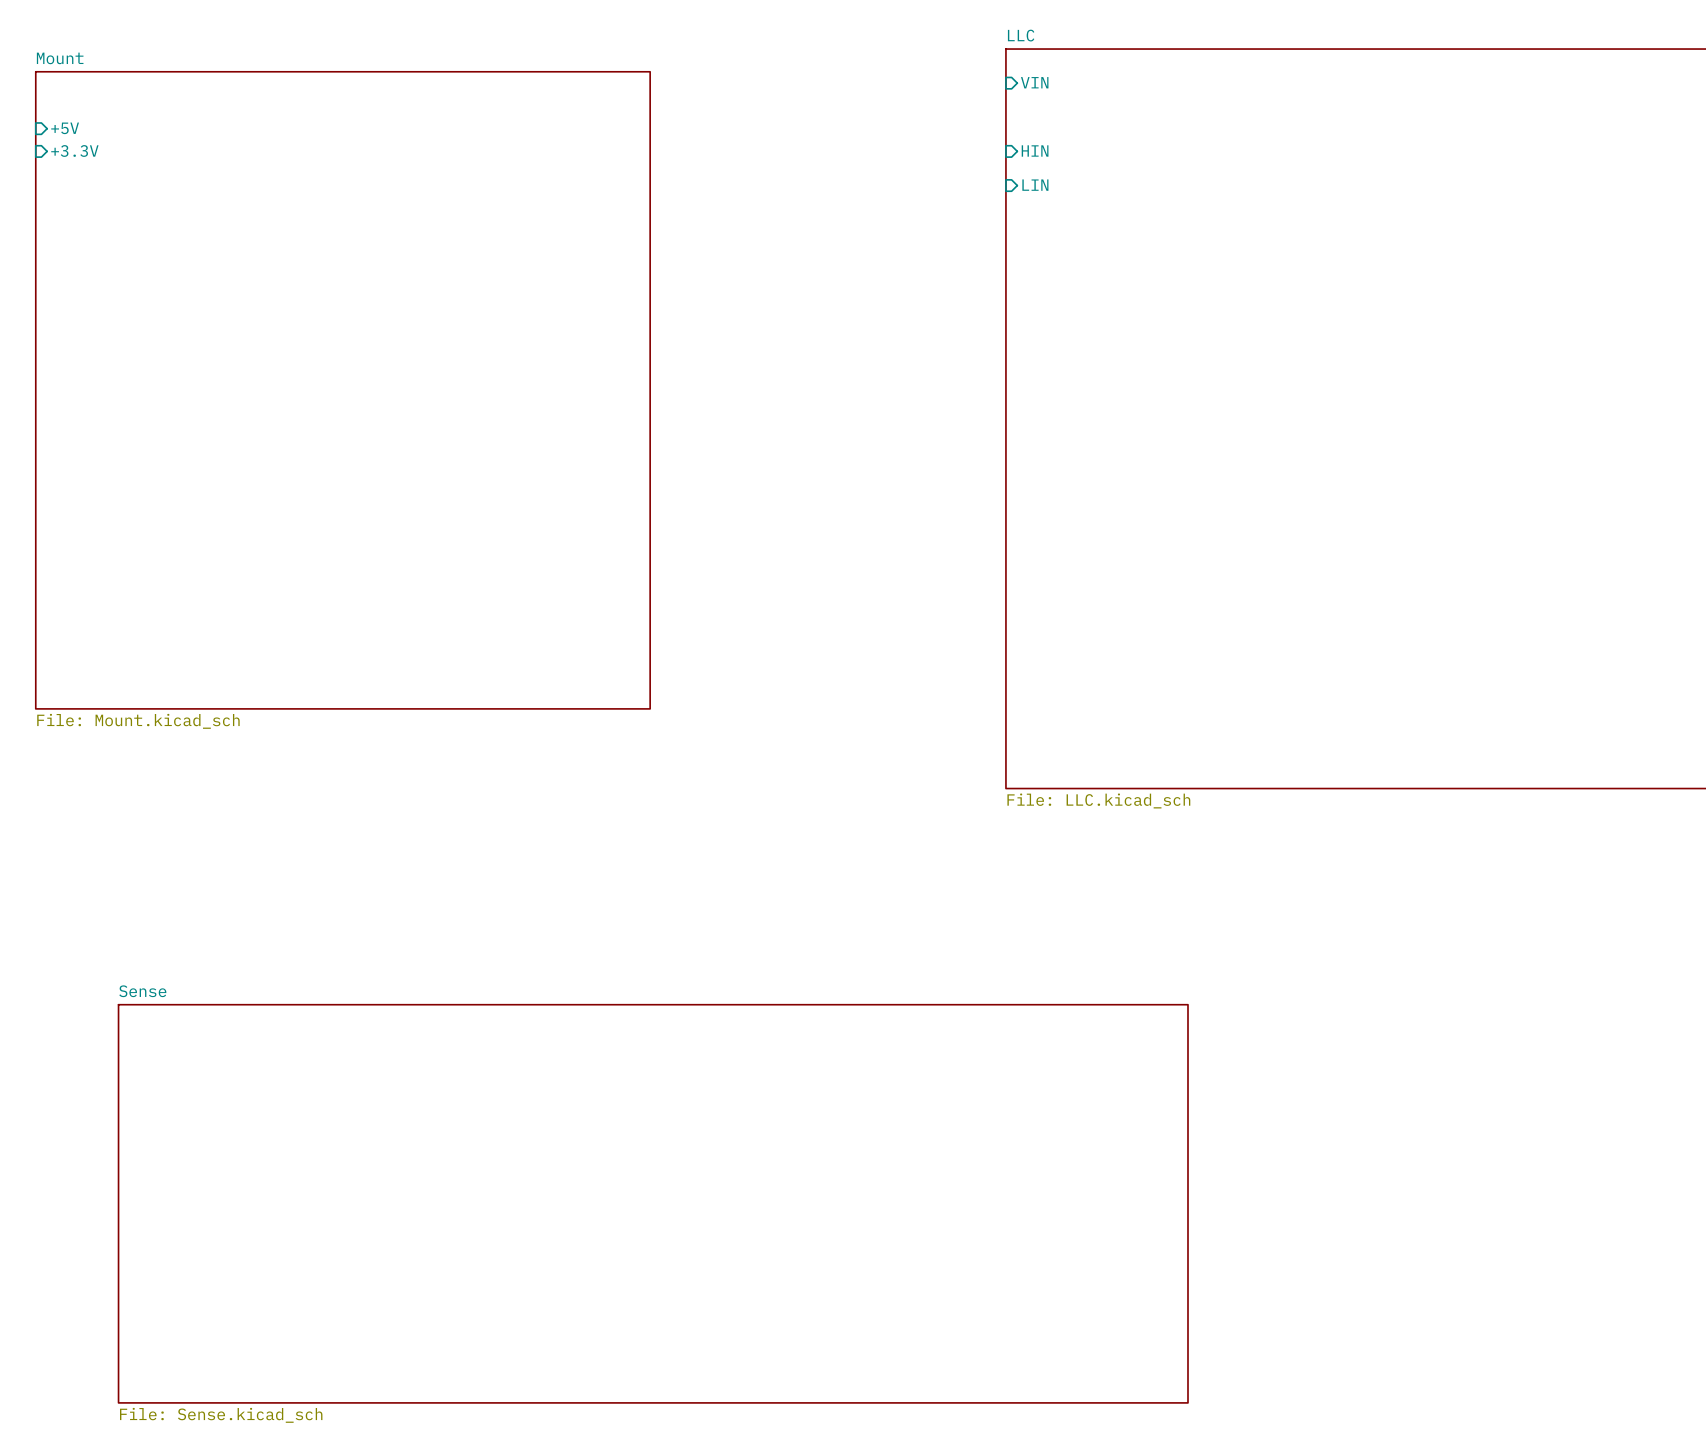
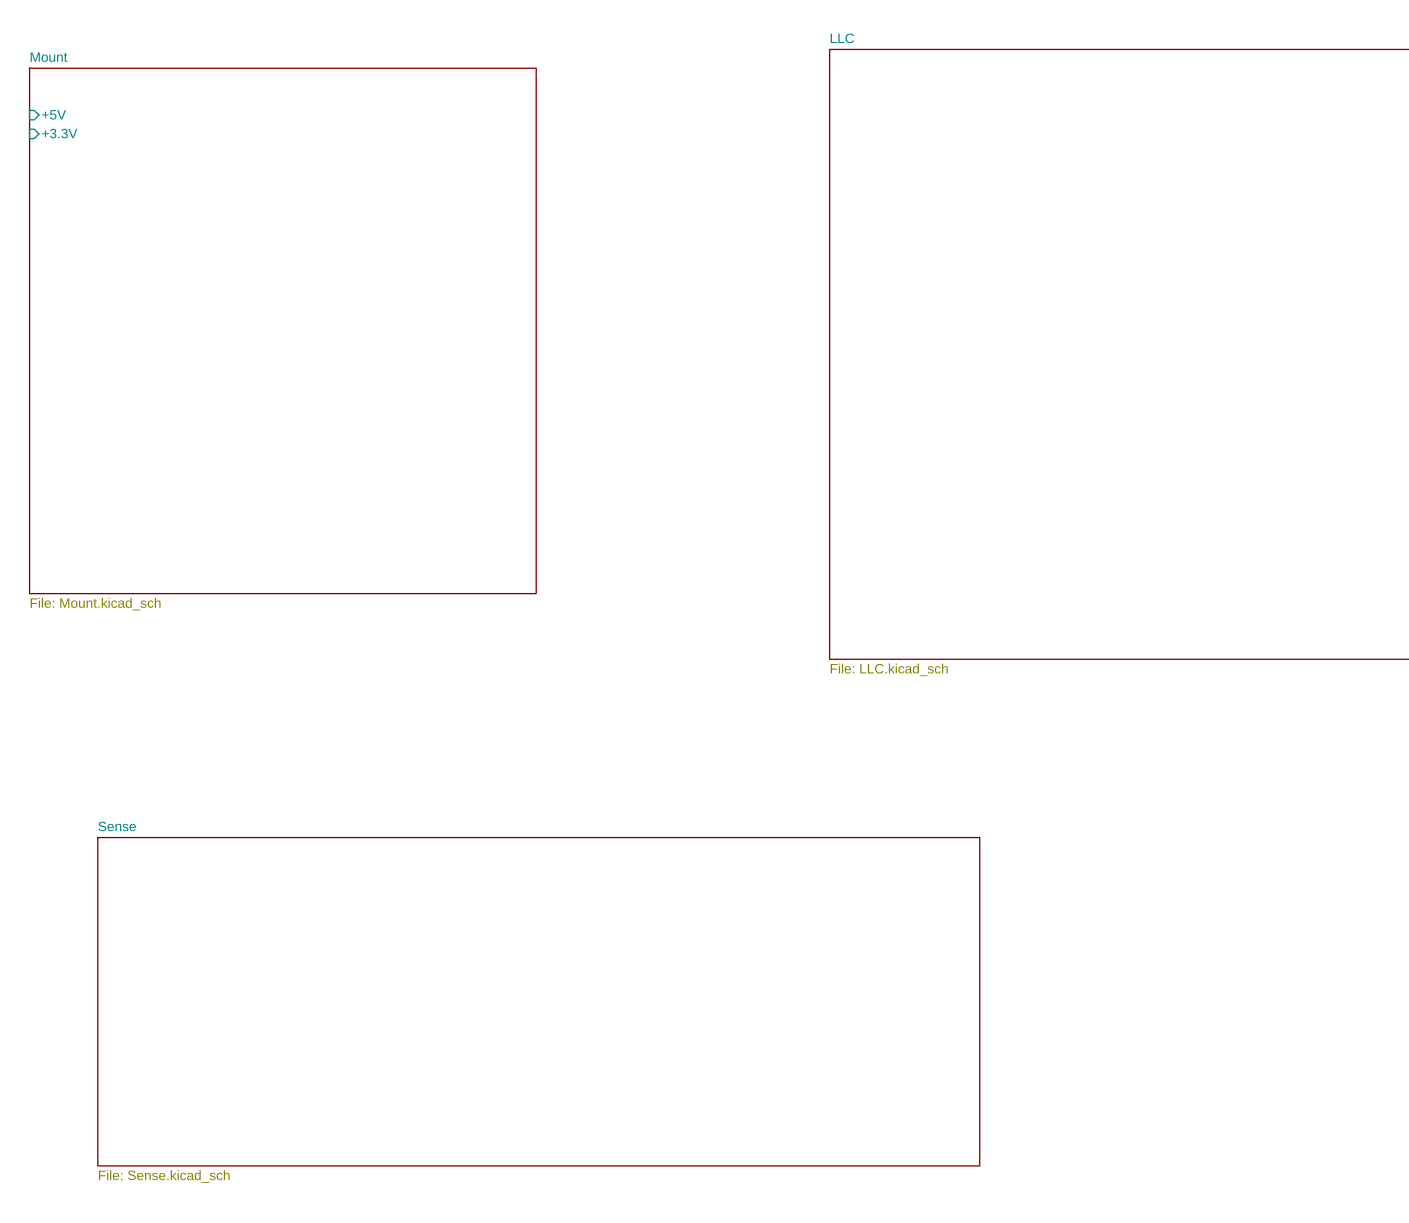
sheet pin: VIN (1034, 82) -> none
sheet pin: HIN (1035, 150) -> none
sheet pin: LIN (1035, 185) -> none

